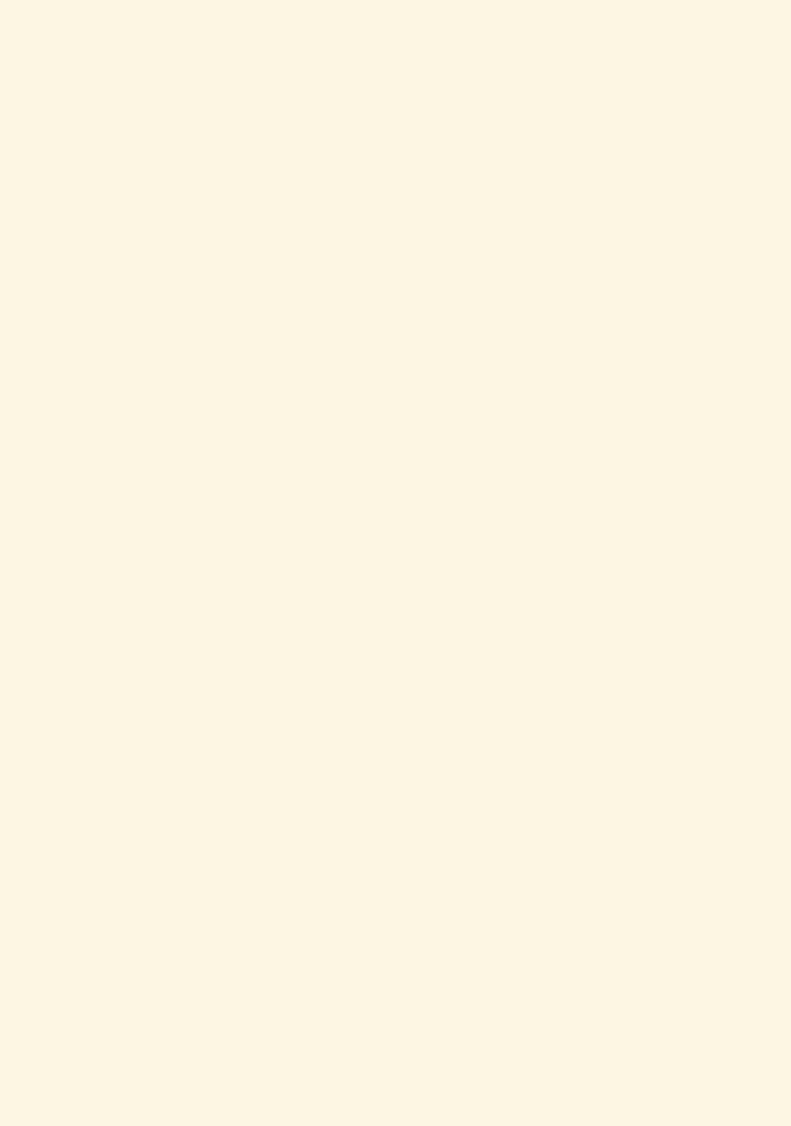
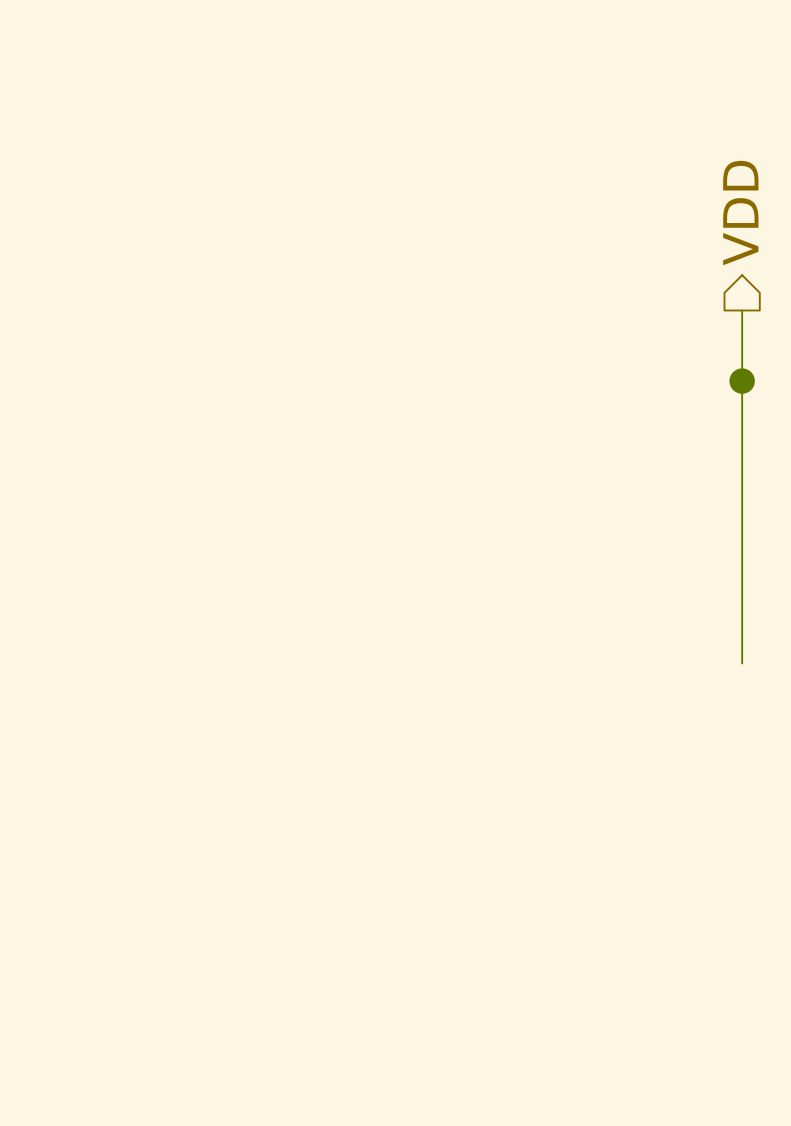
hierarchical label: none -> VDD (740, 213)
wire: none -> (742, 310) (742, 663)
junction: none -> (742, 381)

